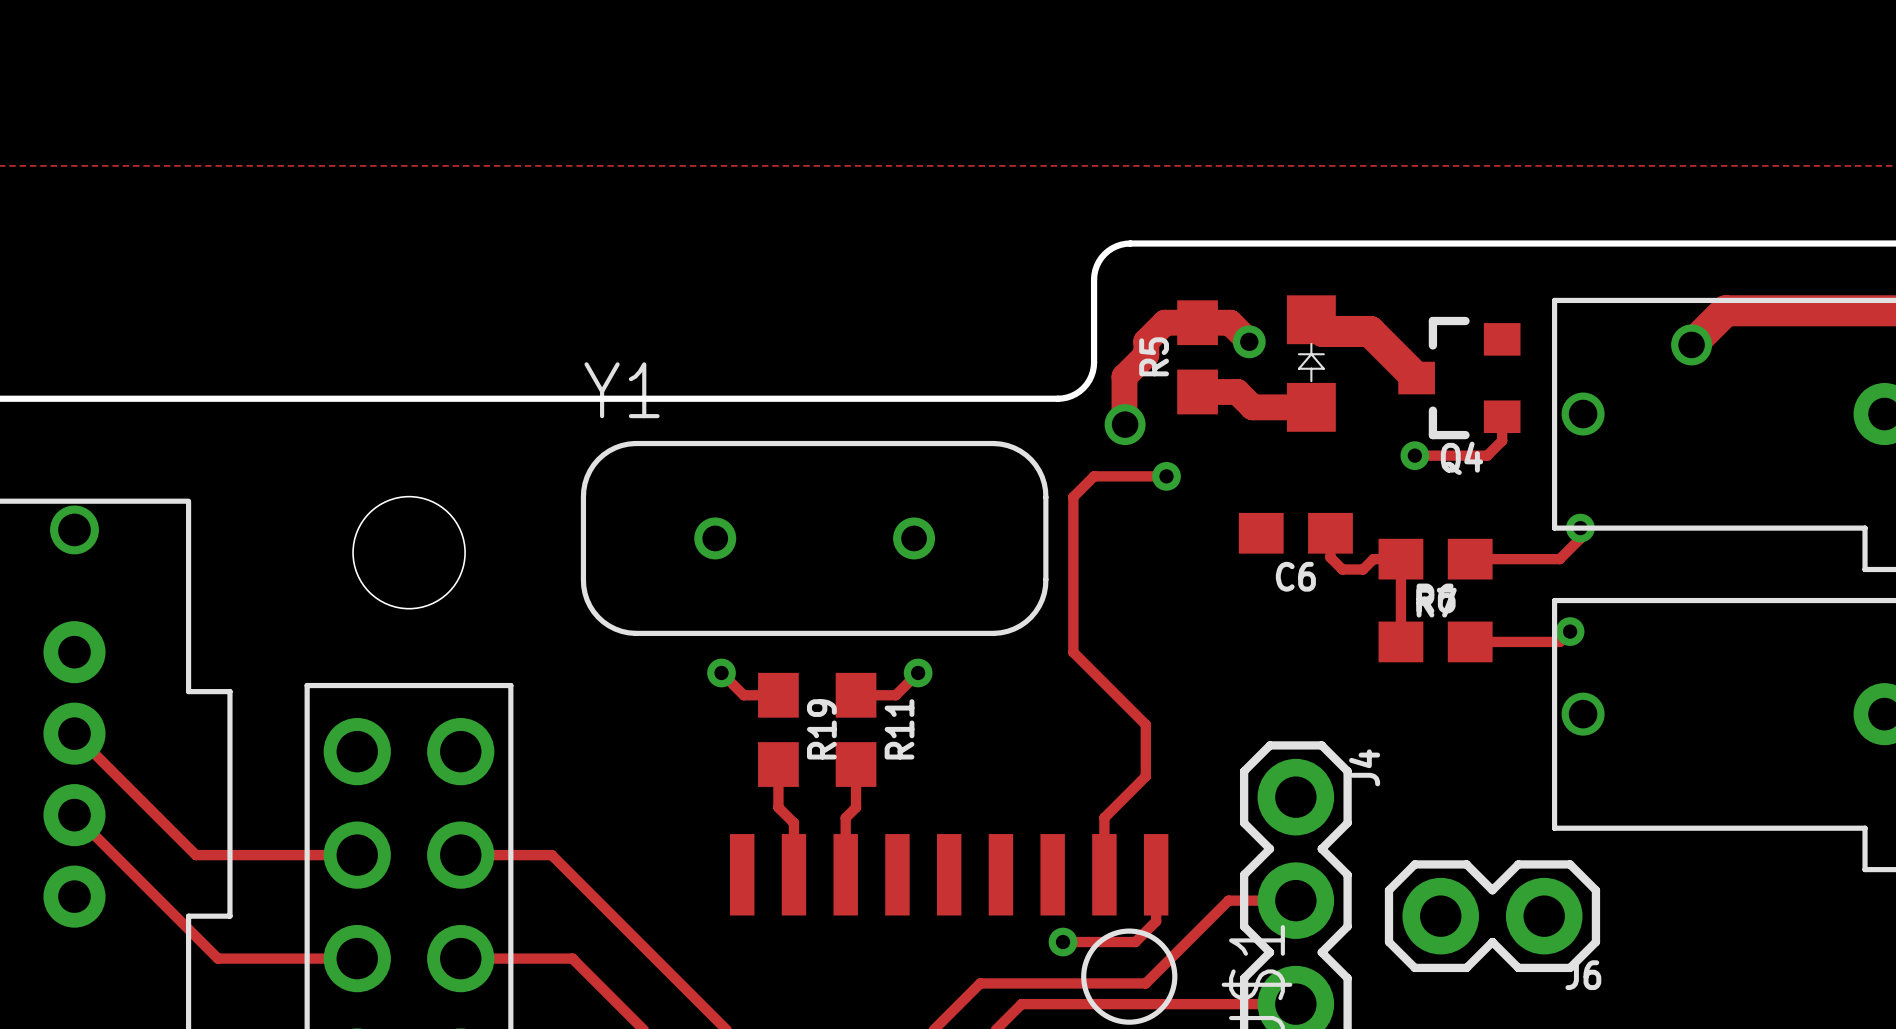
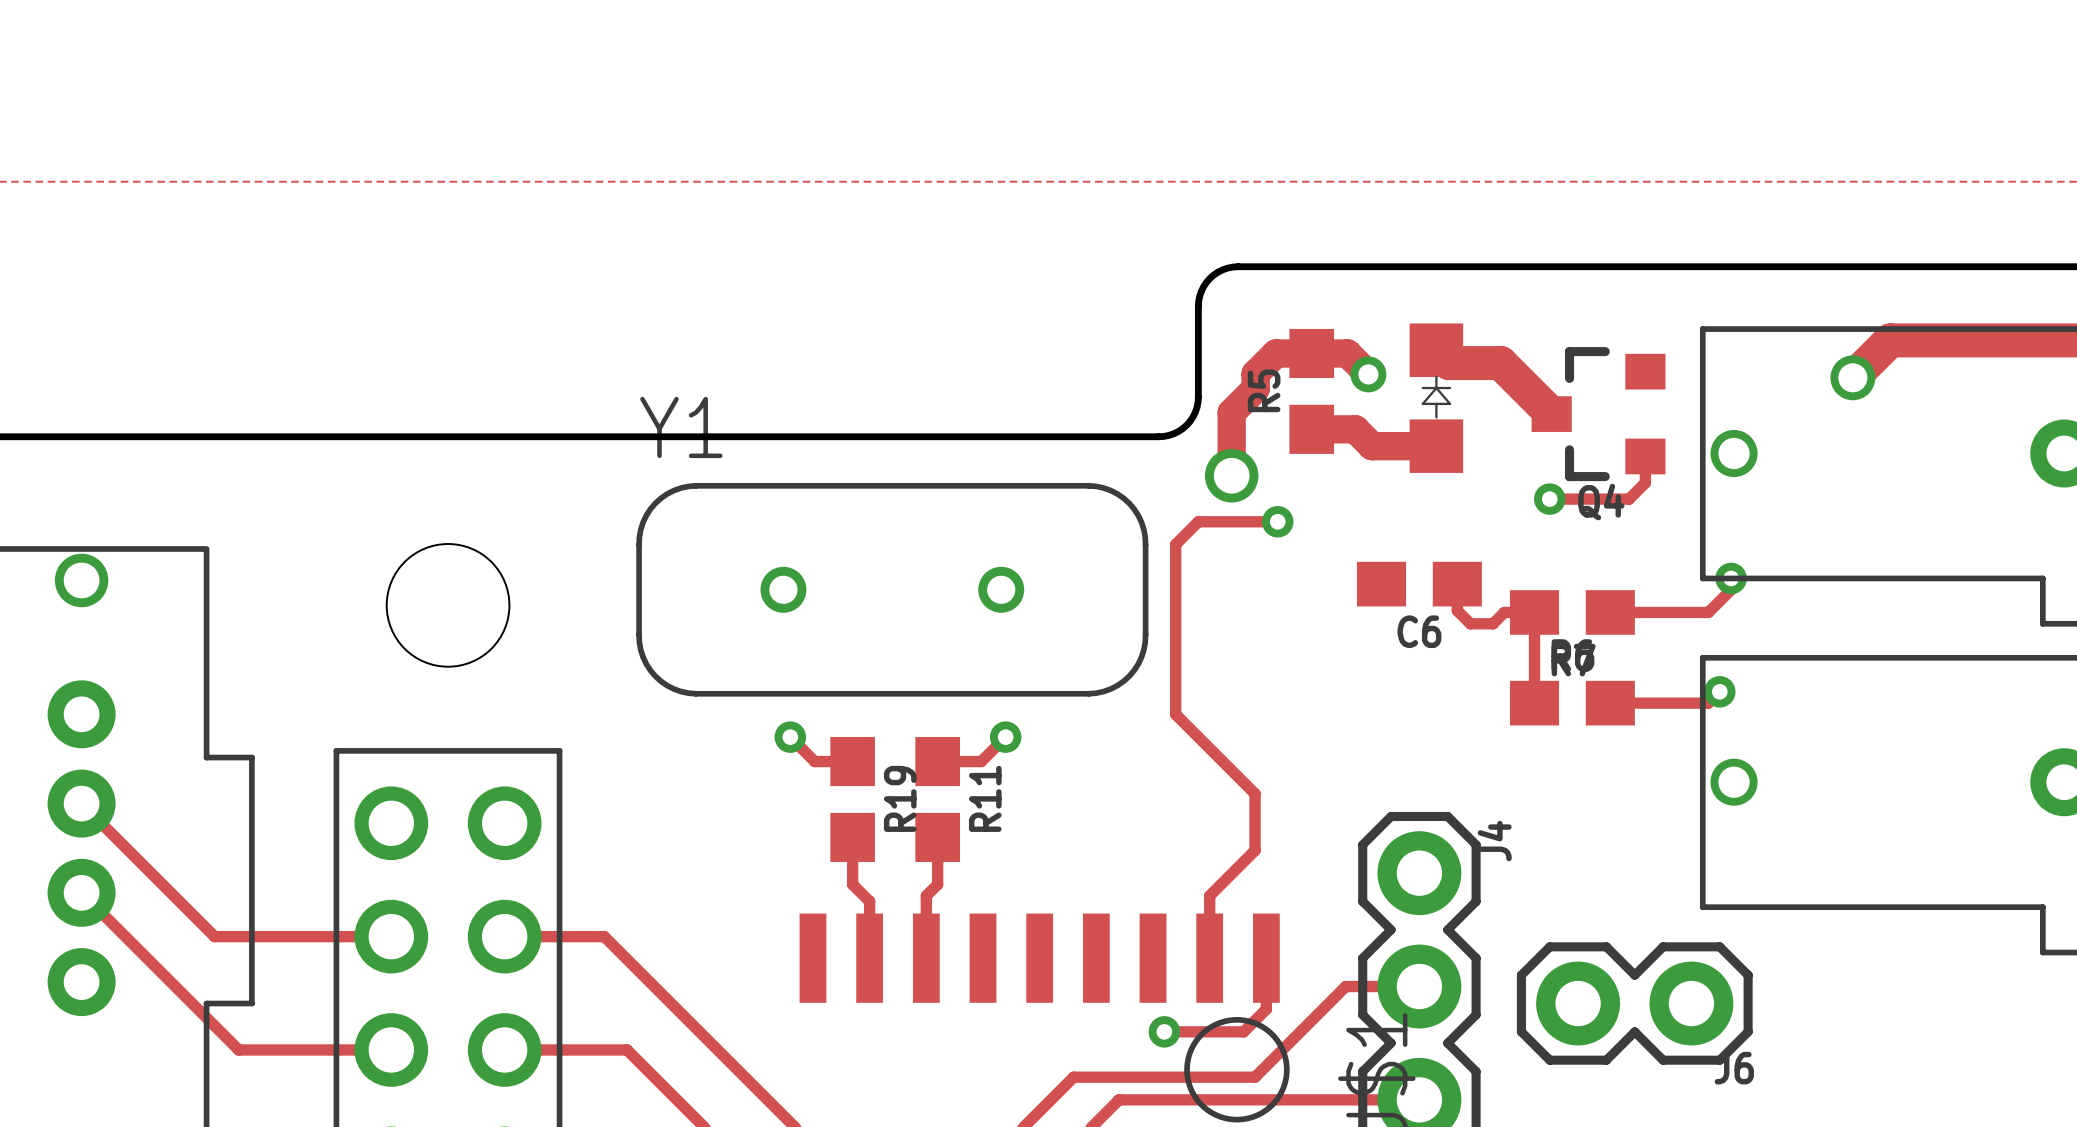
via size: [1104, 404, 1146, 446] -> [1204, 448, 1259, 503]

